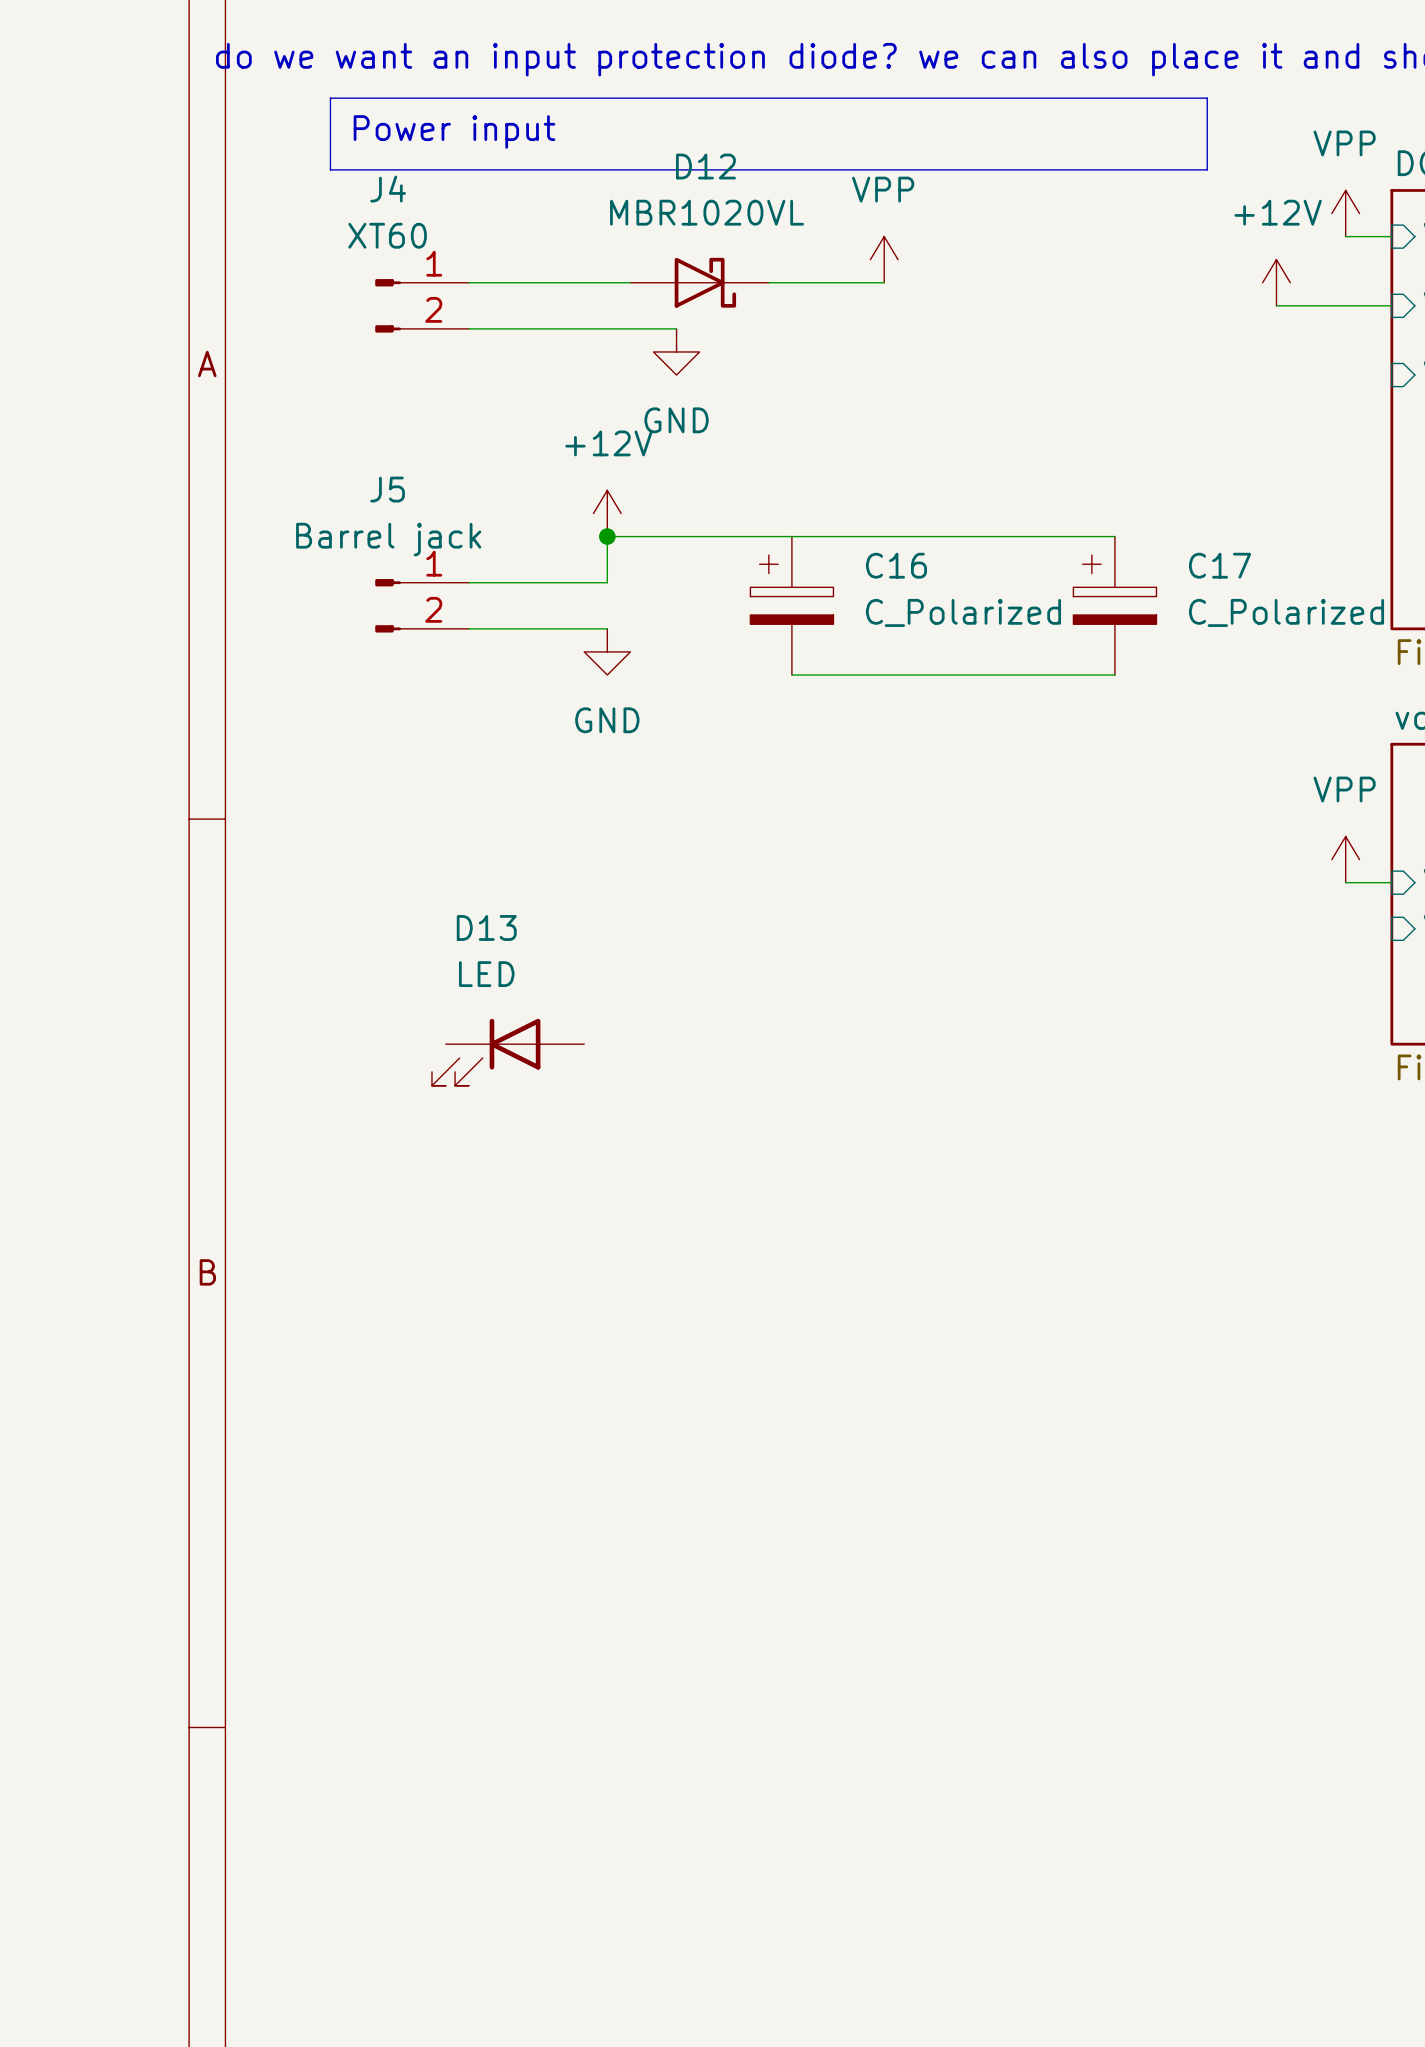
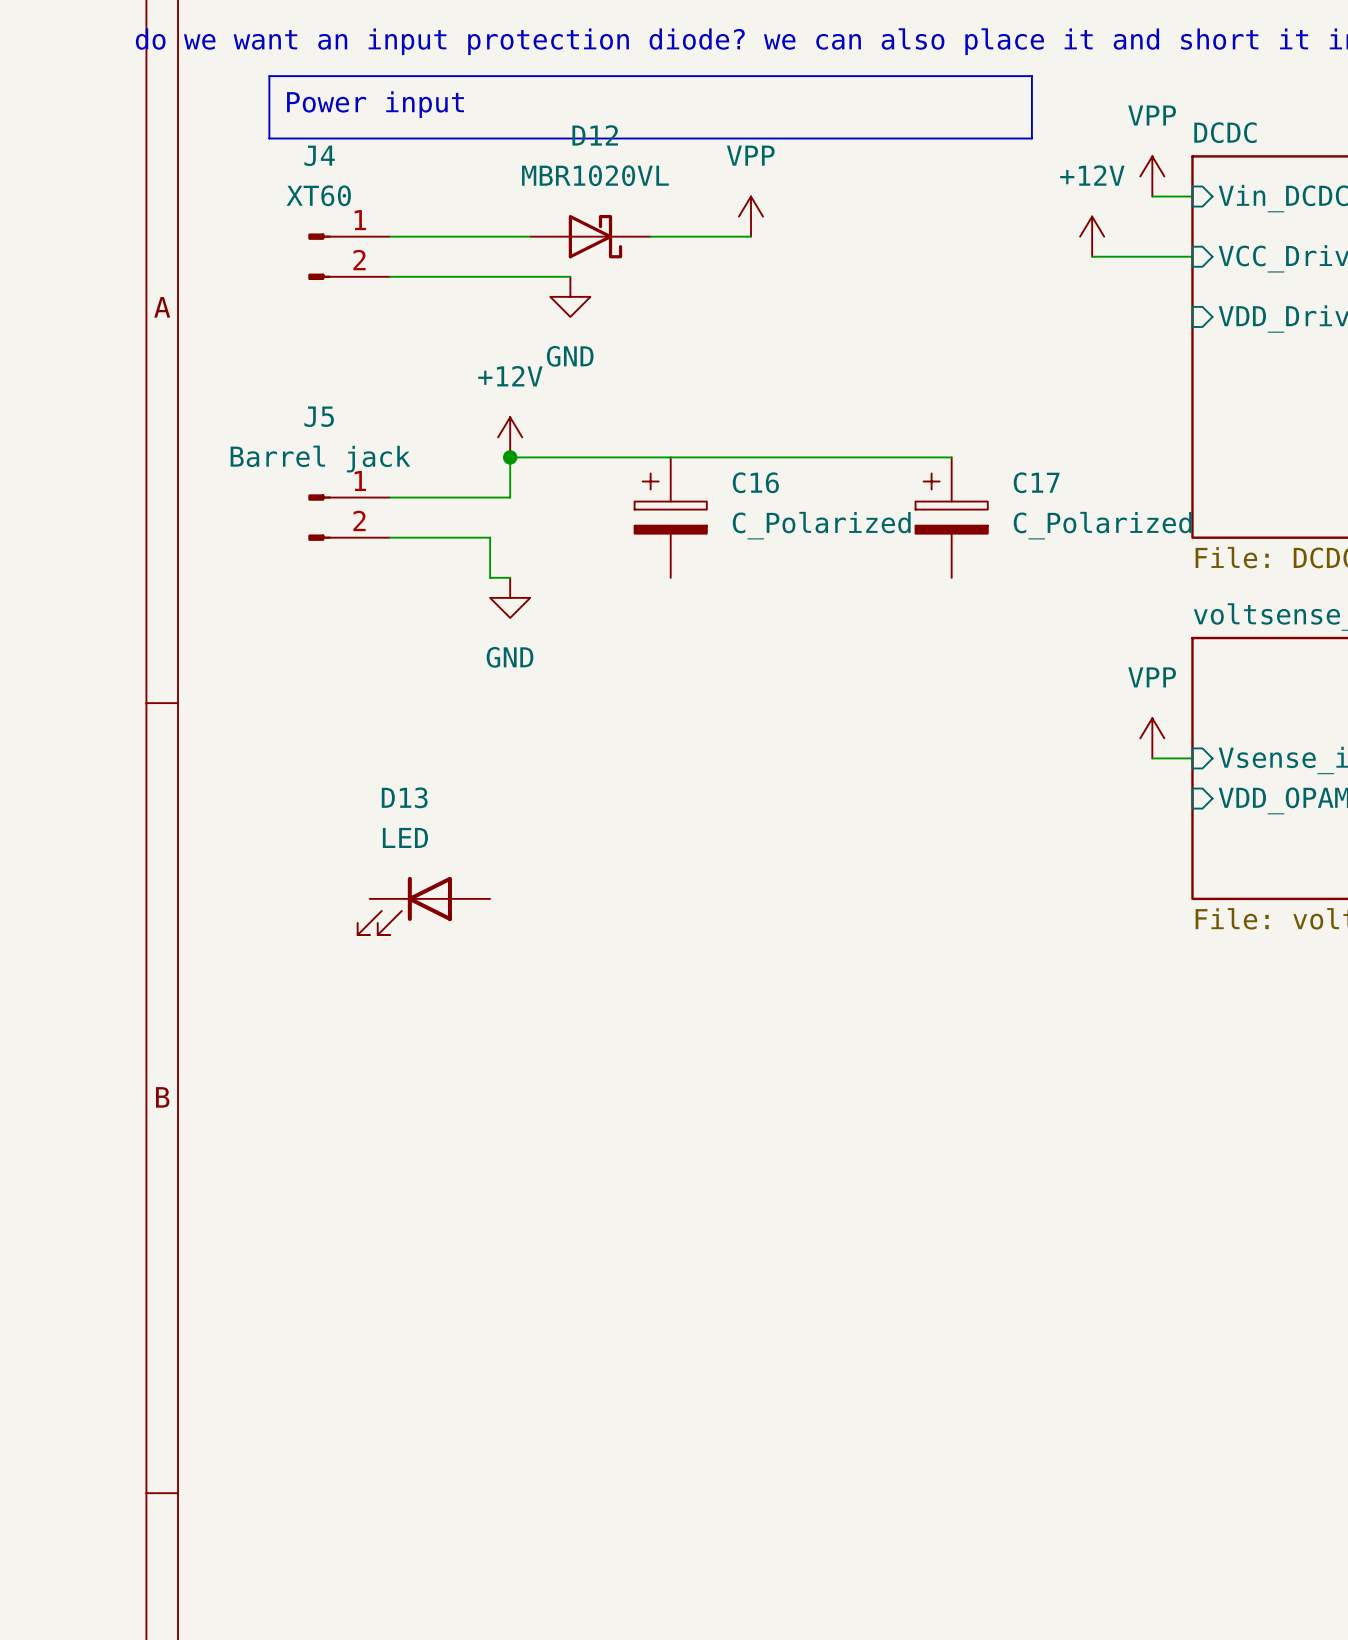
wire: (584, 628) (607, 628) -> (490, 537) (490, 577) (510, 577)
power symbol position: GND (607, 651) -> GND (510, 597)
wire: (791, 675) (1114, 675) -> none

